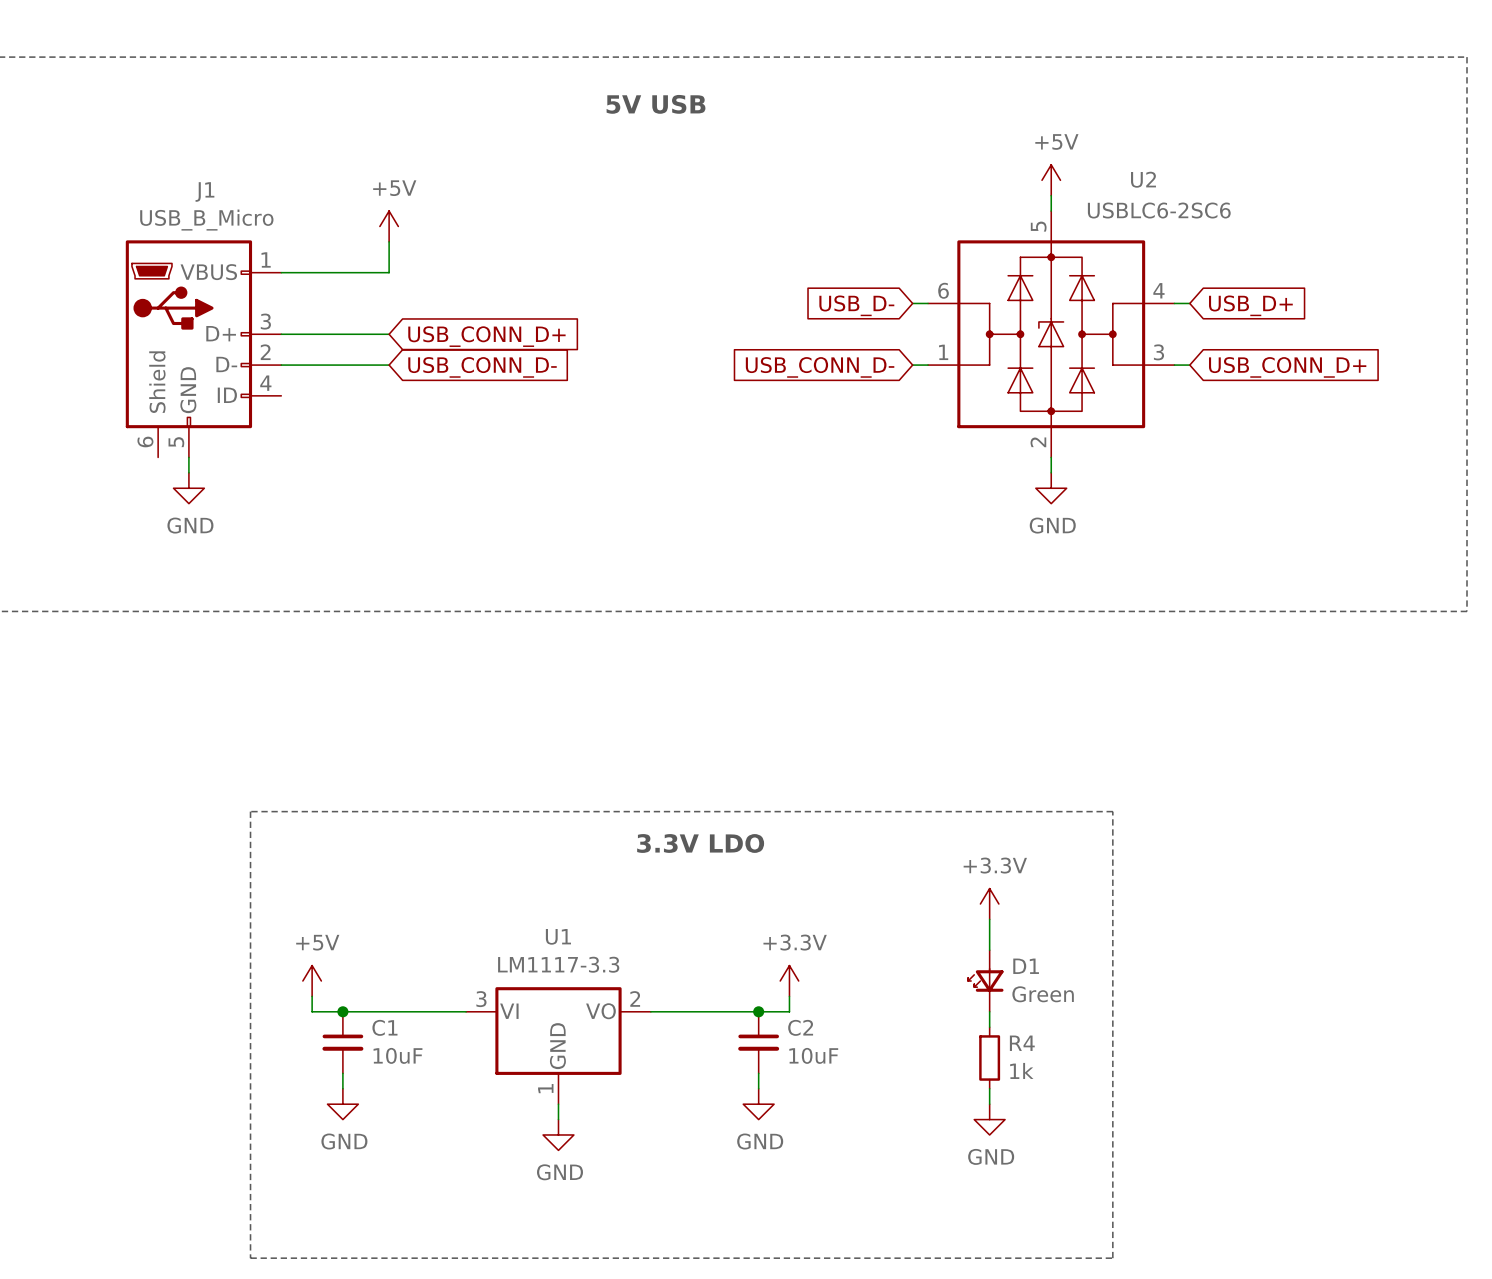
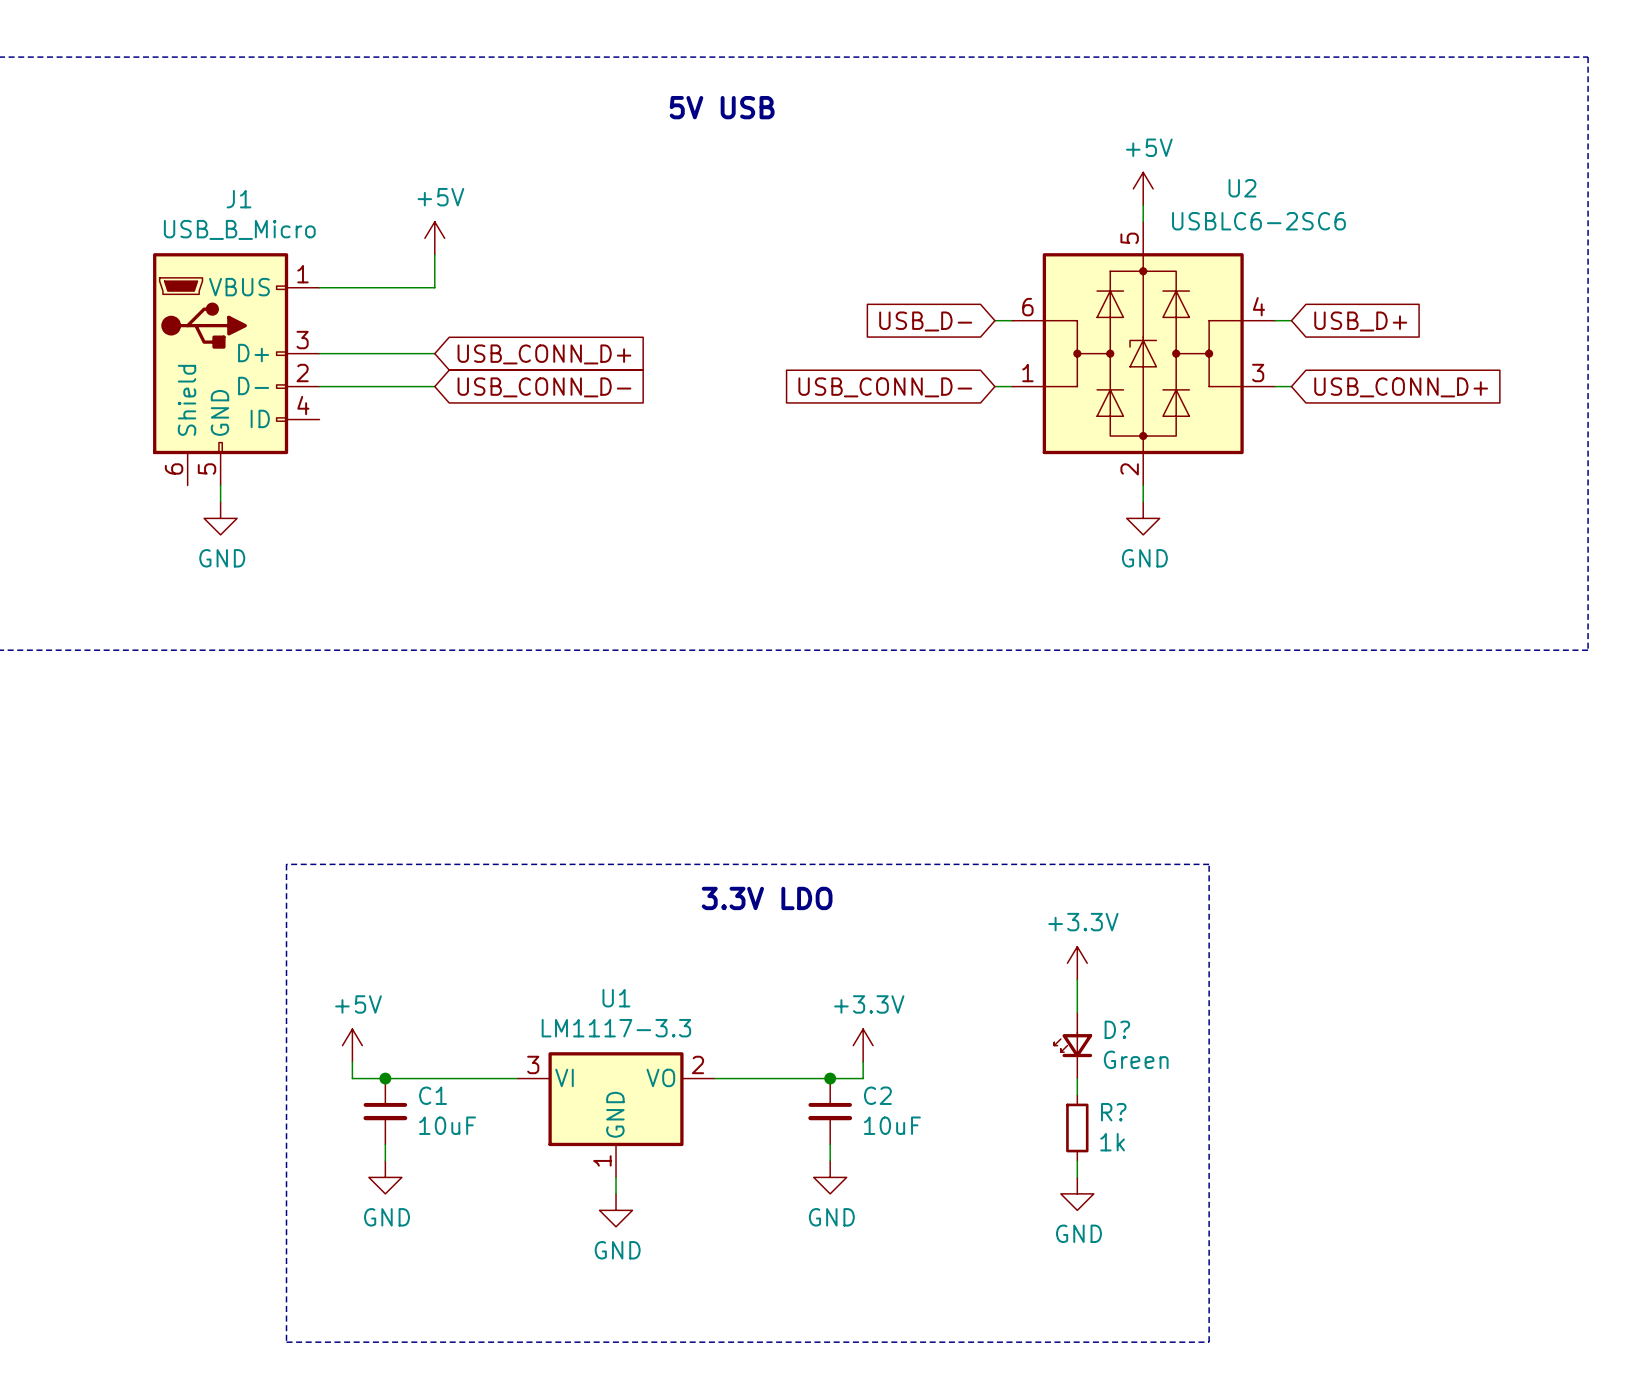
D1 name: D1 (1026, 966) -> D? (1117, 1029)
R4 name: R4 (1022, 1043) -> R? (1113, 1112)

